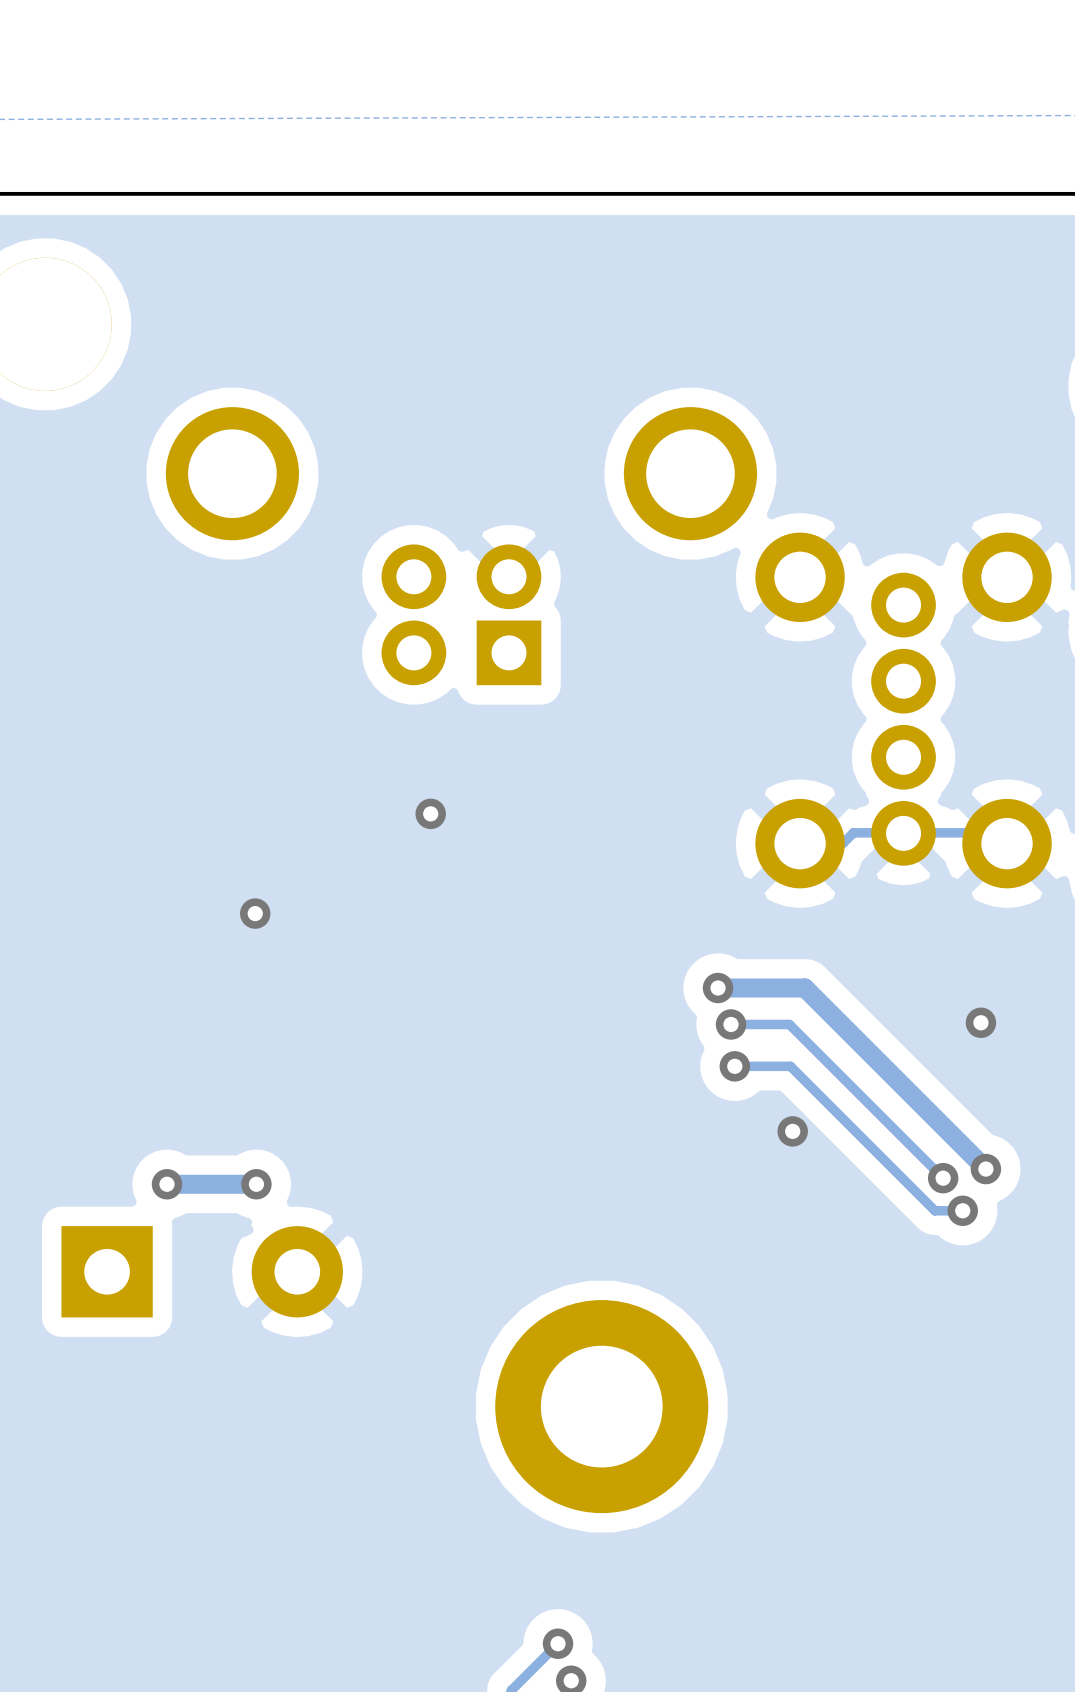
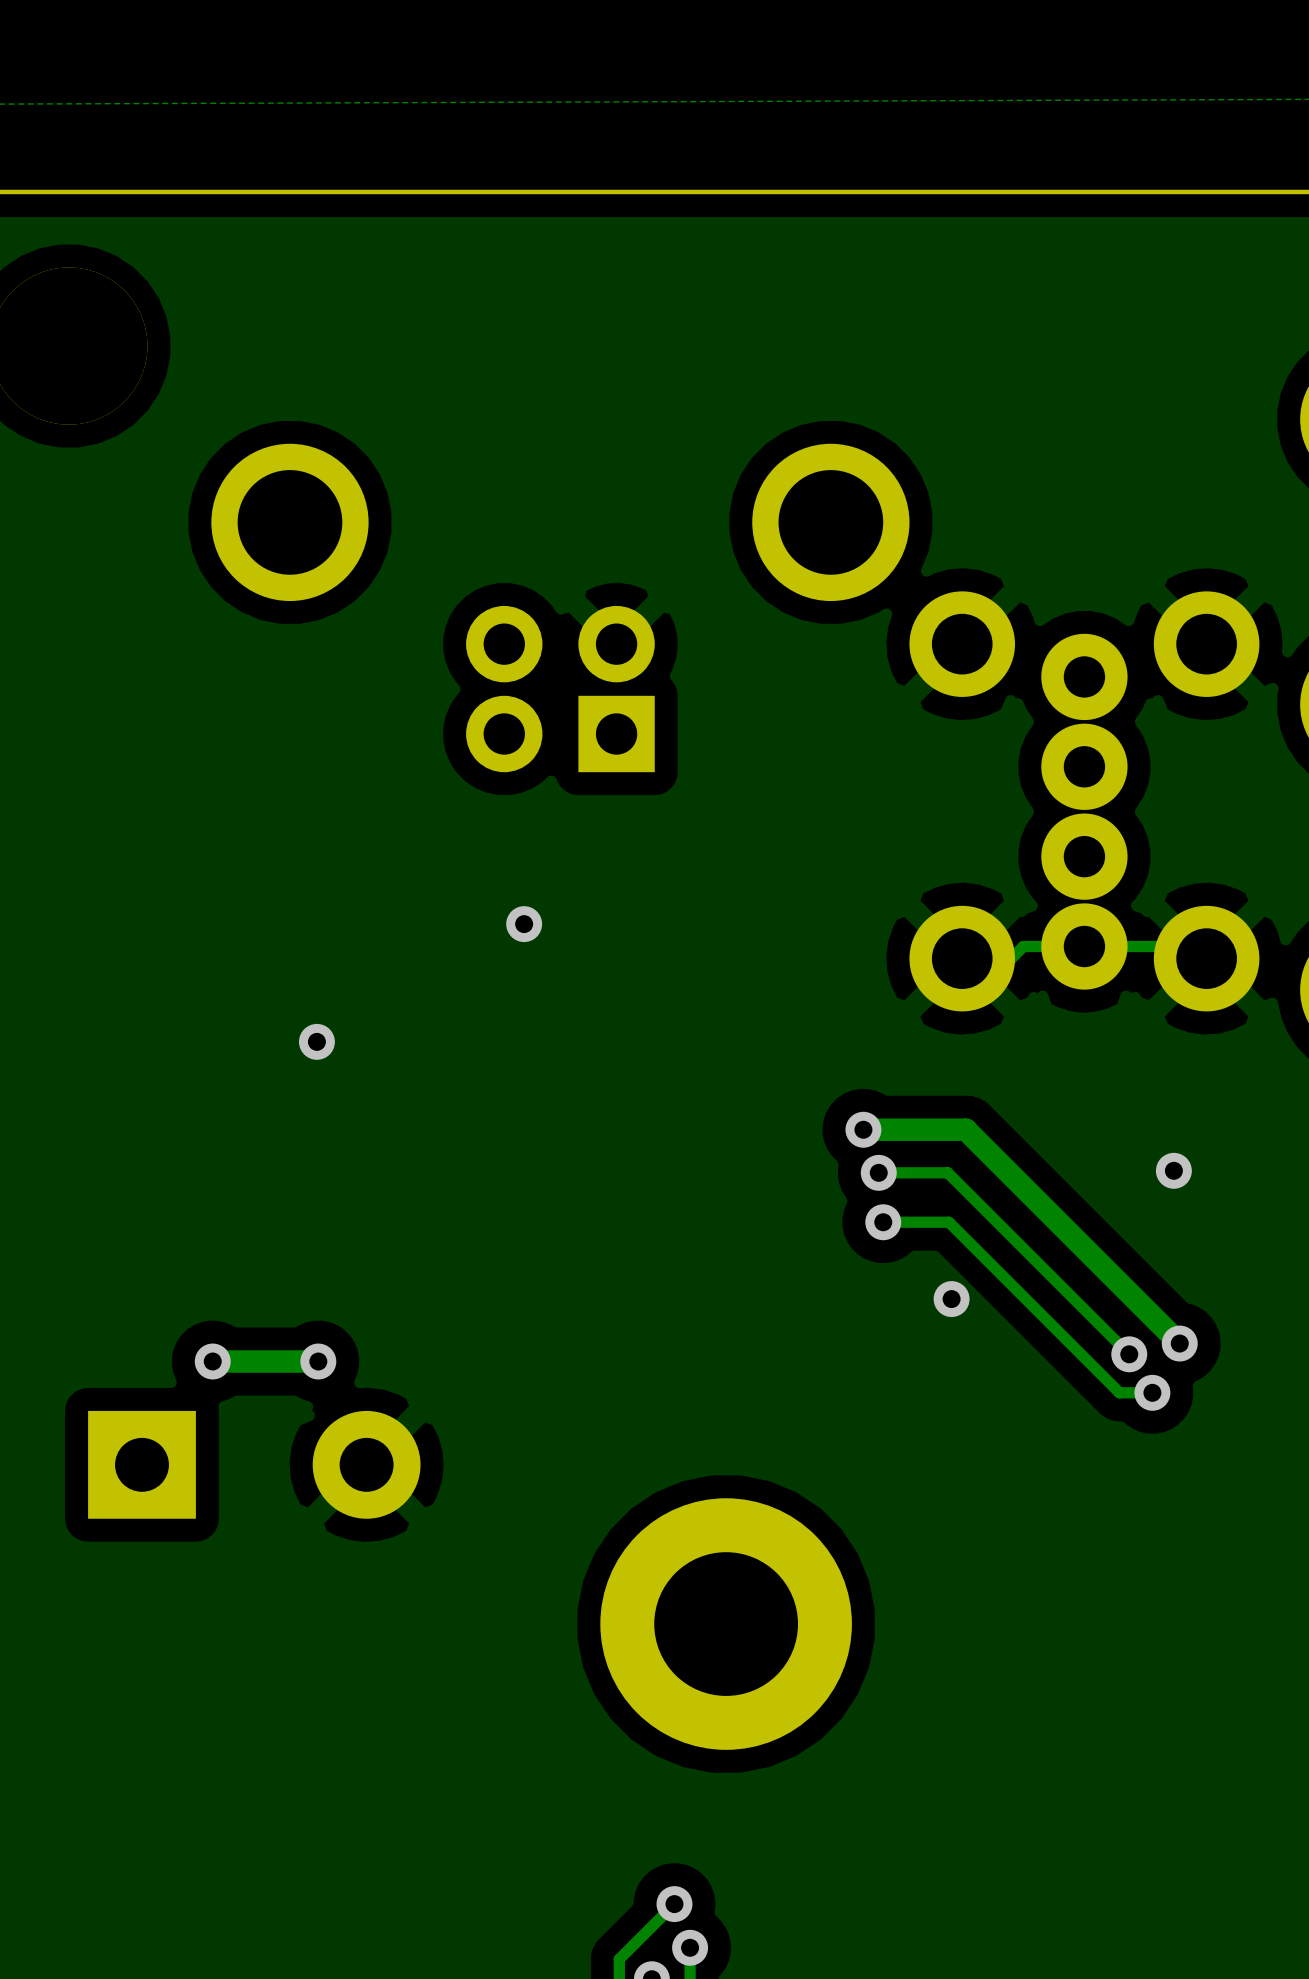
part footprint: [755, 532, 1052, 889] -> [909, 591, 1260, 1012]

